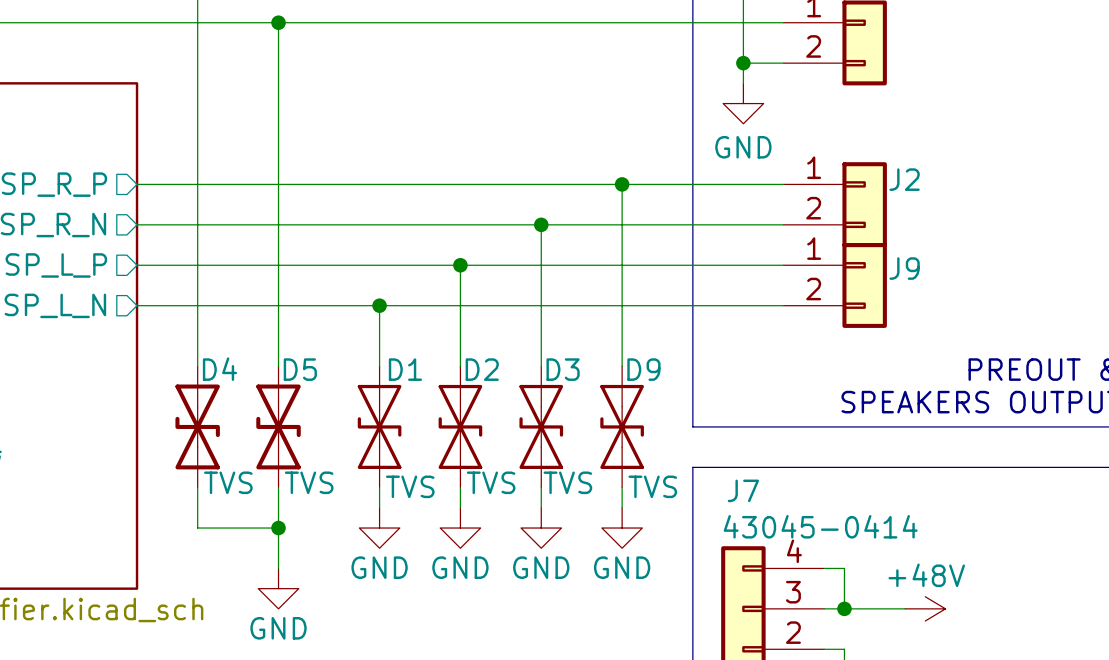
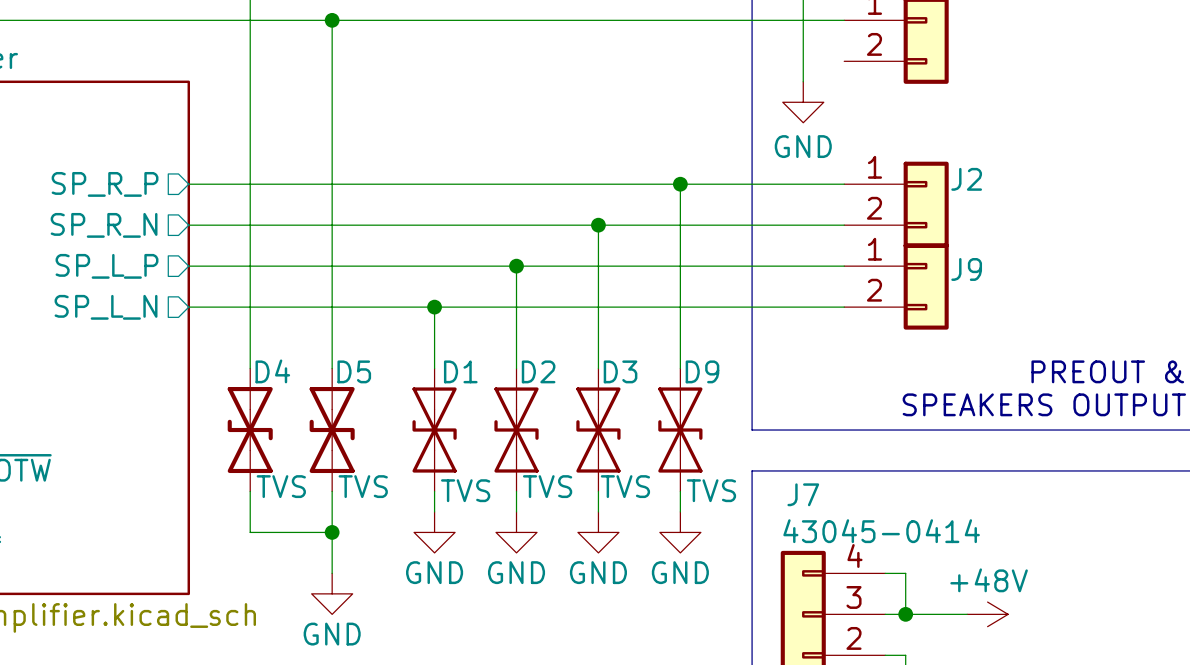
wire: (743, 63) (783, 63) -> none
junction: (743, 63) -> none

